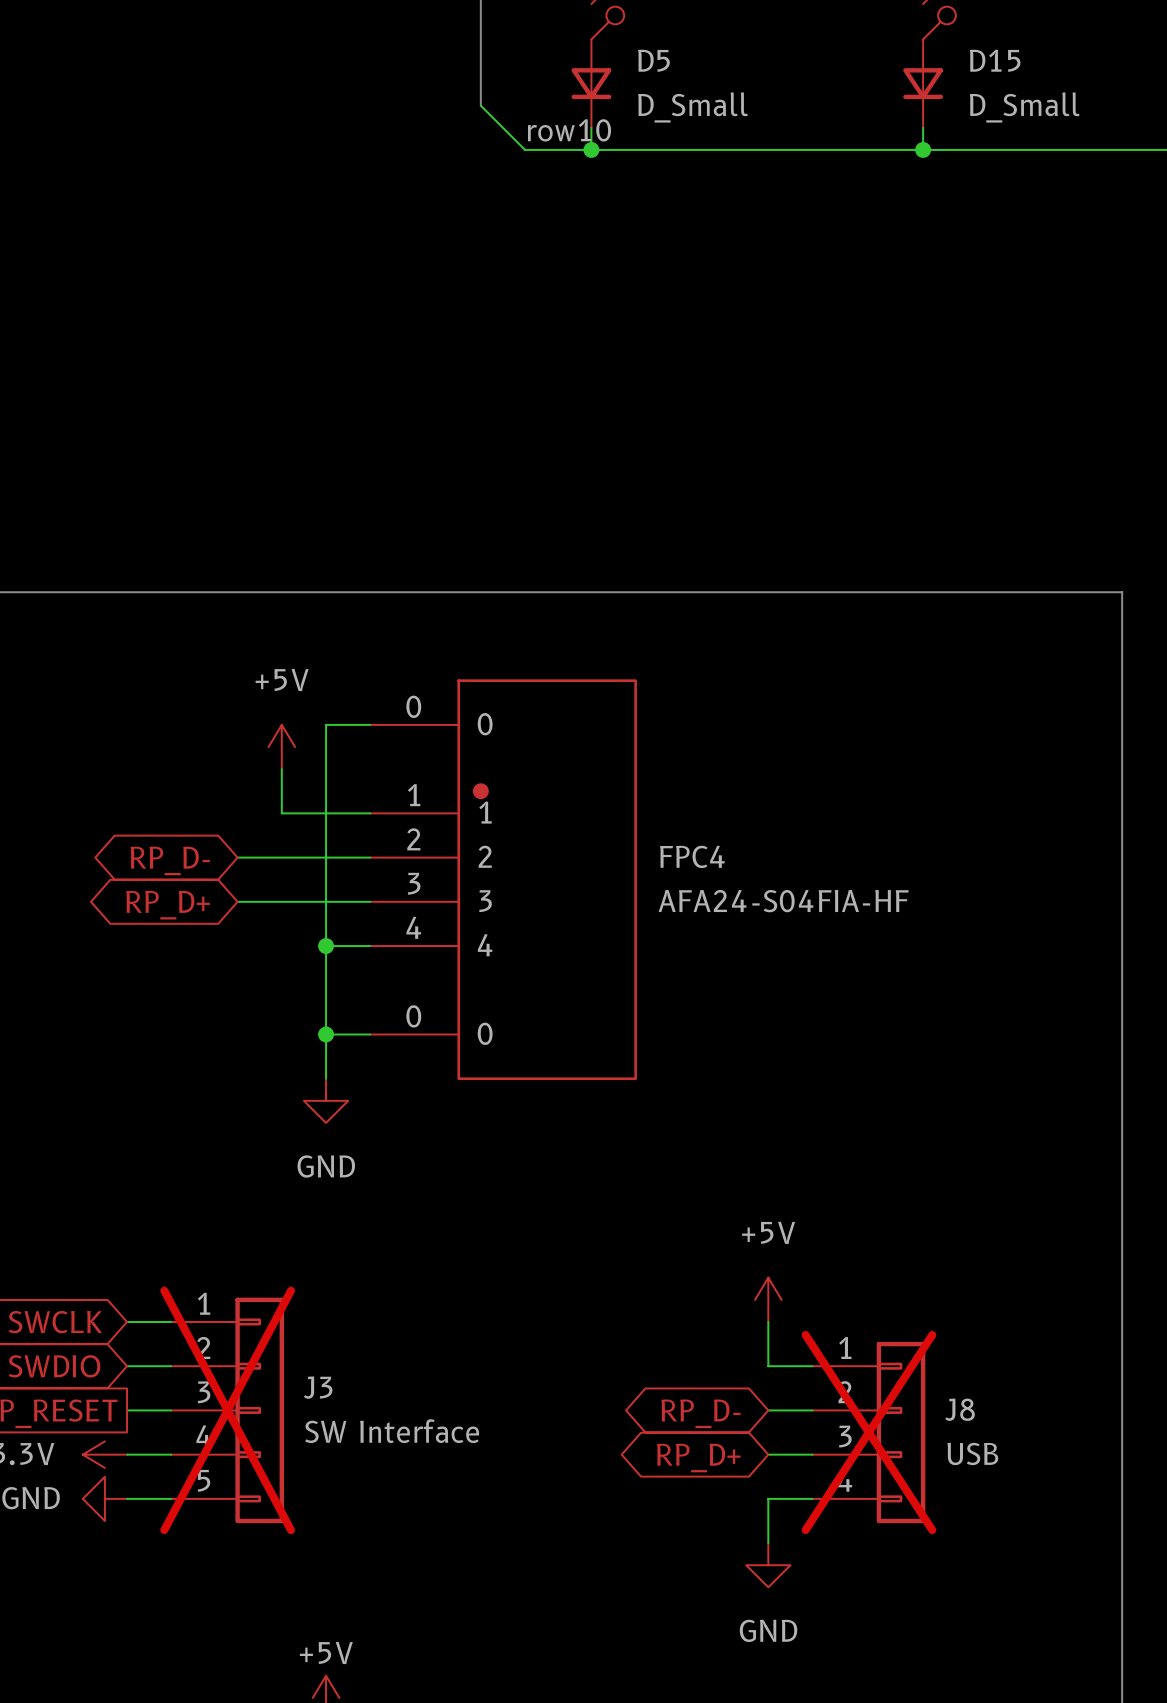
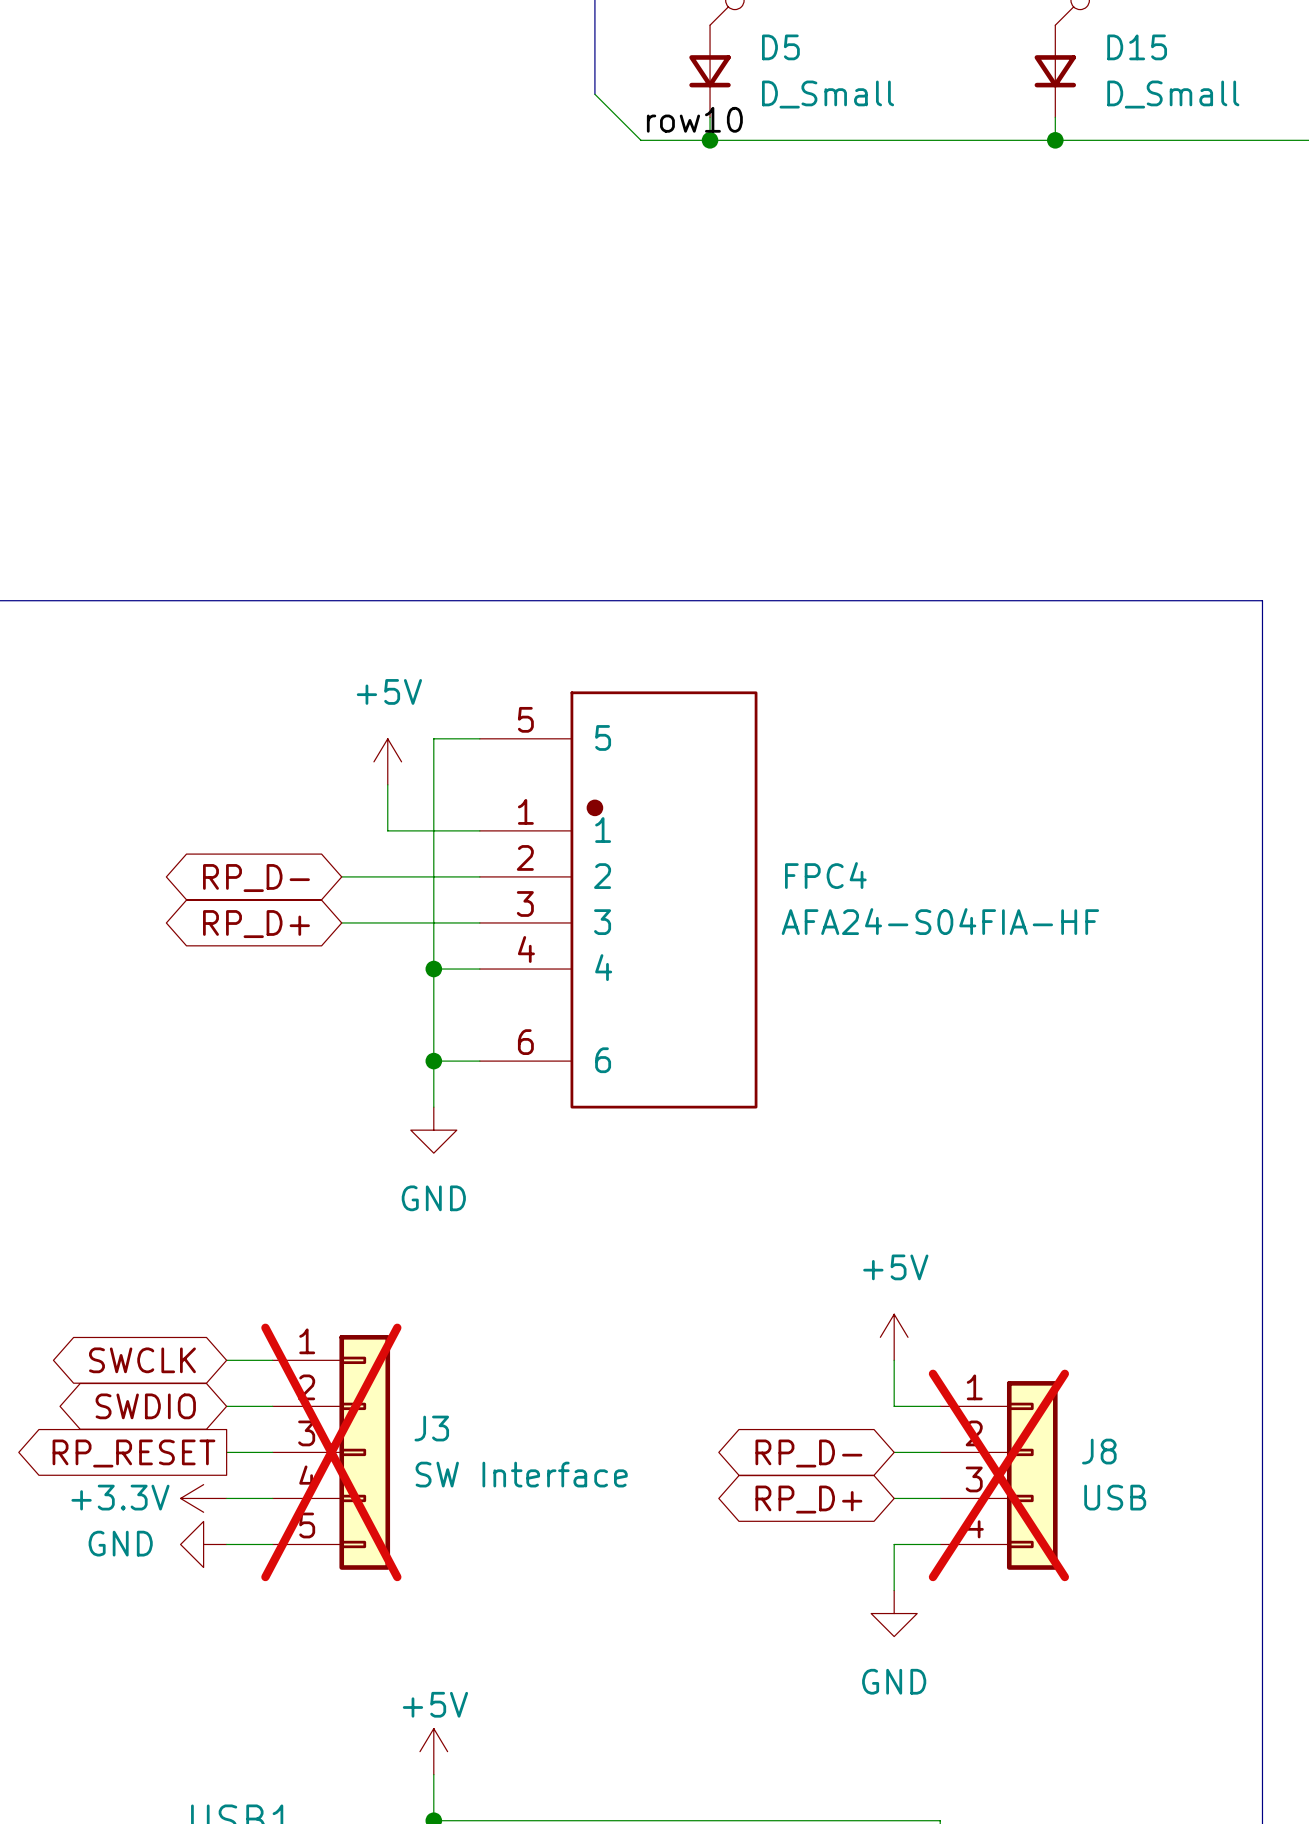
FPC4 pin number: 0 (413, 706) -> 5 (525, 719)
FPC4 pin name: 0 (485, 724) -> 5 (603, 737)
FPC4 pin number: 0 (413, 1016) -> 6 (525, 1042)
FPC4 pin name: 0 (485, 1033) -> 6 (603, 1060)

